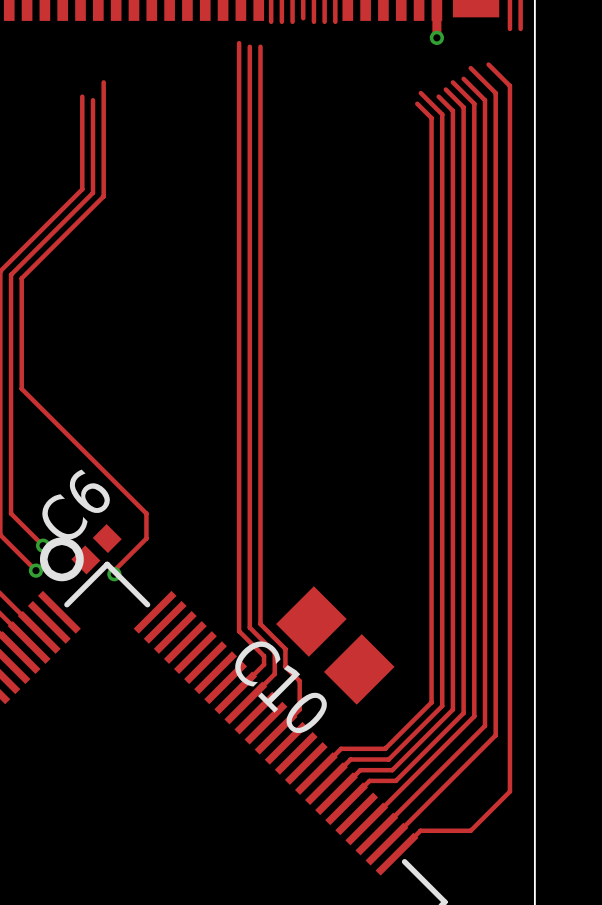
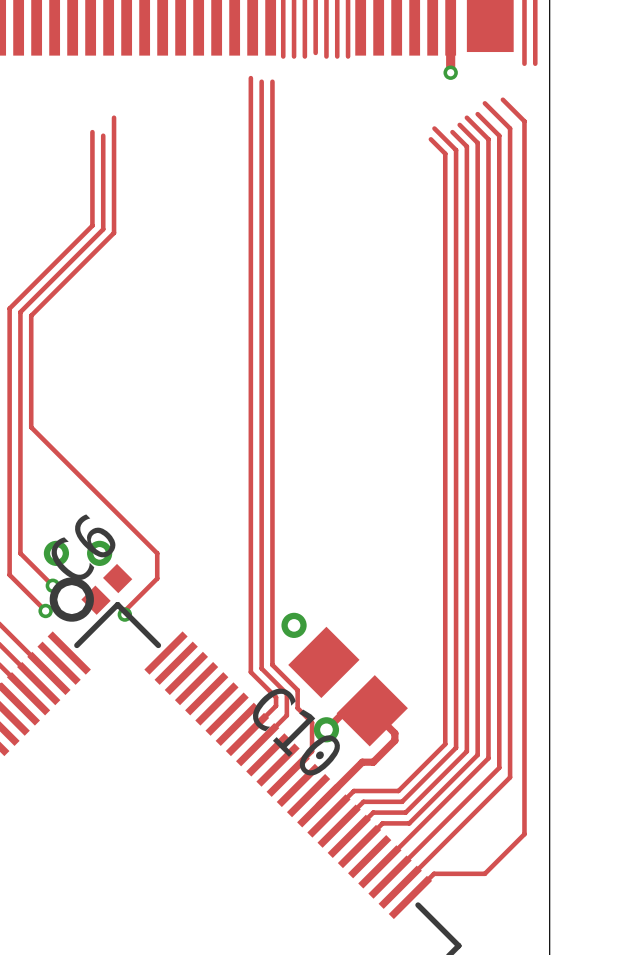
via: none -> (56, 553)
via: none -> (99, 553)
via: none -> (294, 625)
track: none -> (326, 729) (345, 710) (372, 710) (394, 733) (394, 740) (373, 762) (362, 762) (318, 805)
via: none -> (326, 729)

